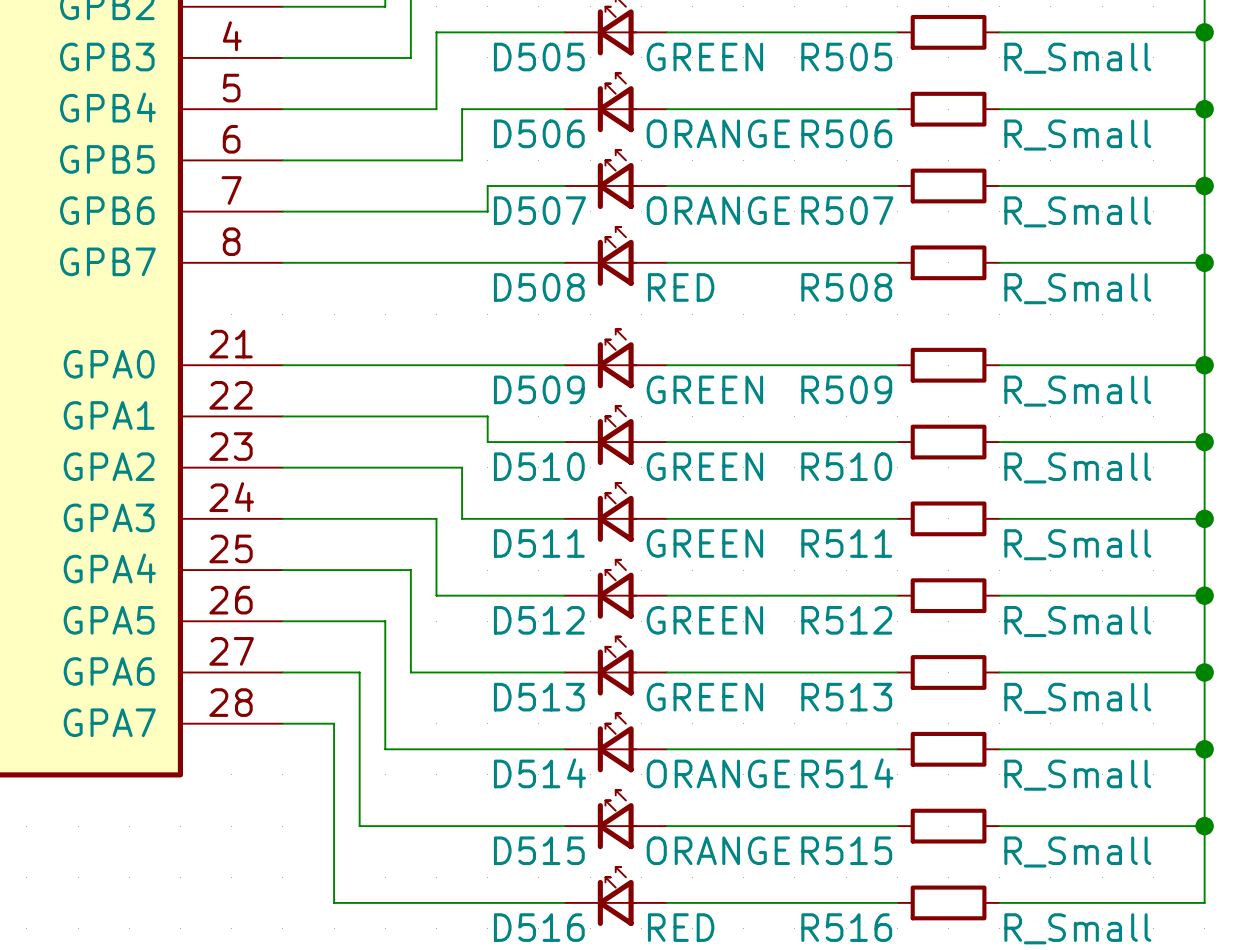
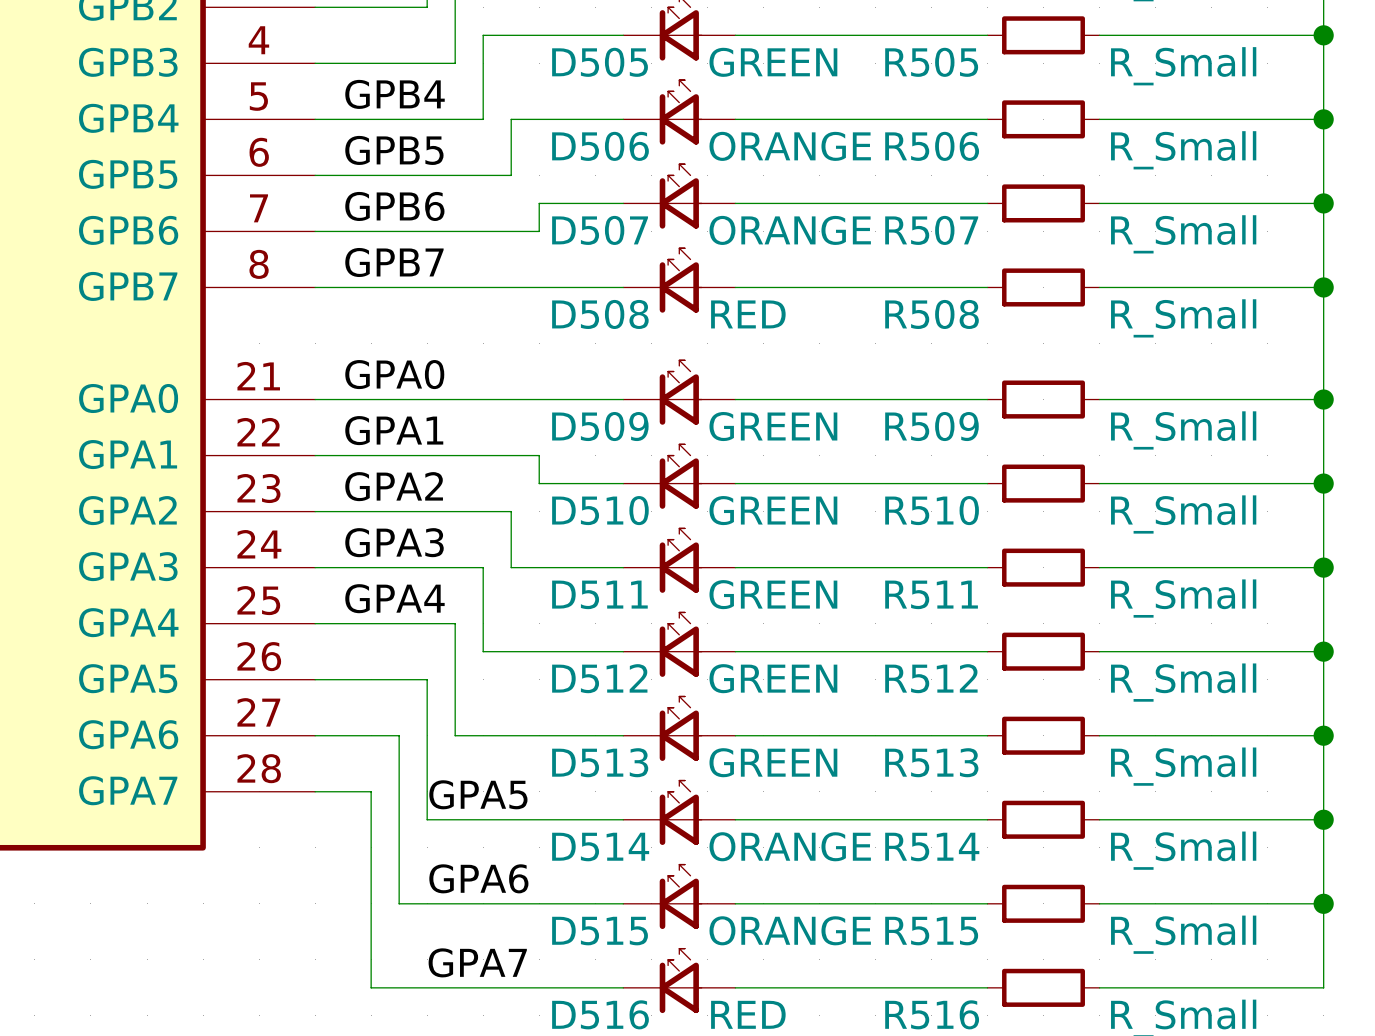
label: none -> GPB4 (395, 94)
label: none -> GPB5 (394, 150)
label: none -> GPB6 (394, 206)
label: none -> GPB7 (394, 262)
label: none -> GPA0 (394, 374)
label: none -> GPA1 (394, 430)
label: none -> GPA2 (394, 486)
label: none -> GPA3 (394, 542)
label: none -> GPA4 (394, 598)
label: none -> GPA5 (478, 794)
label: none -> GPA6 (478, 878)
label: none -> GPA7 (477, 962)

